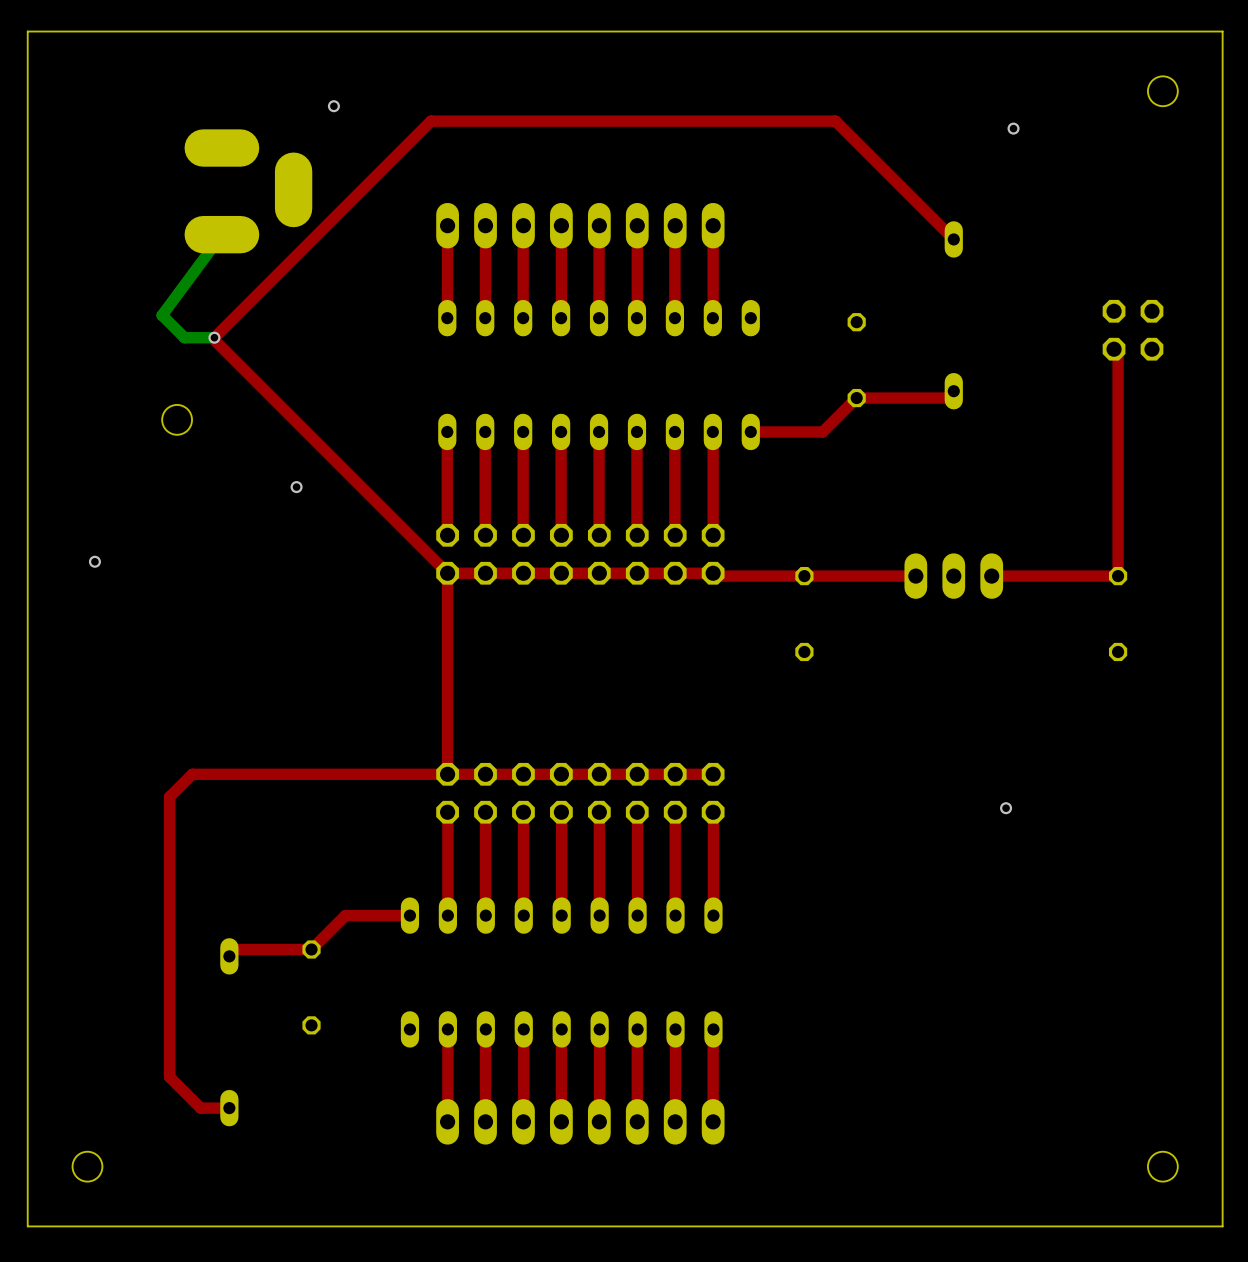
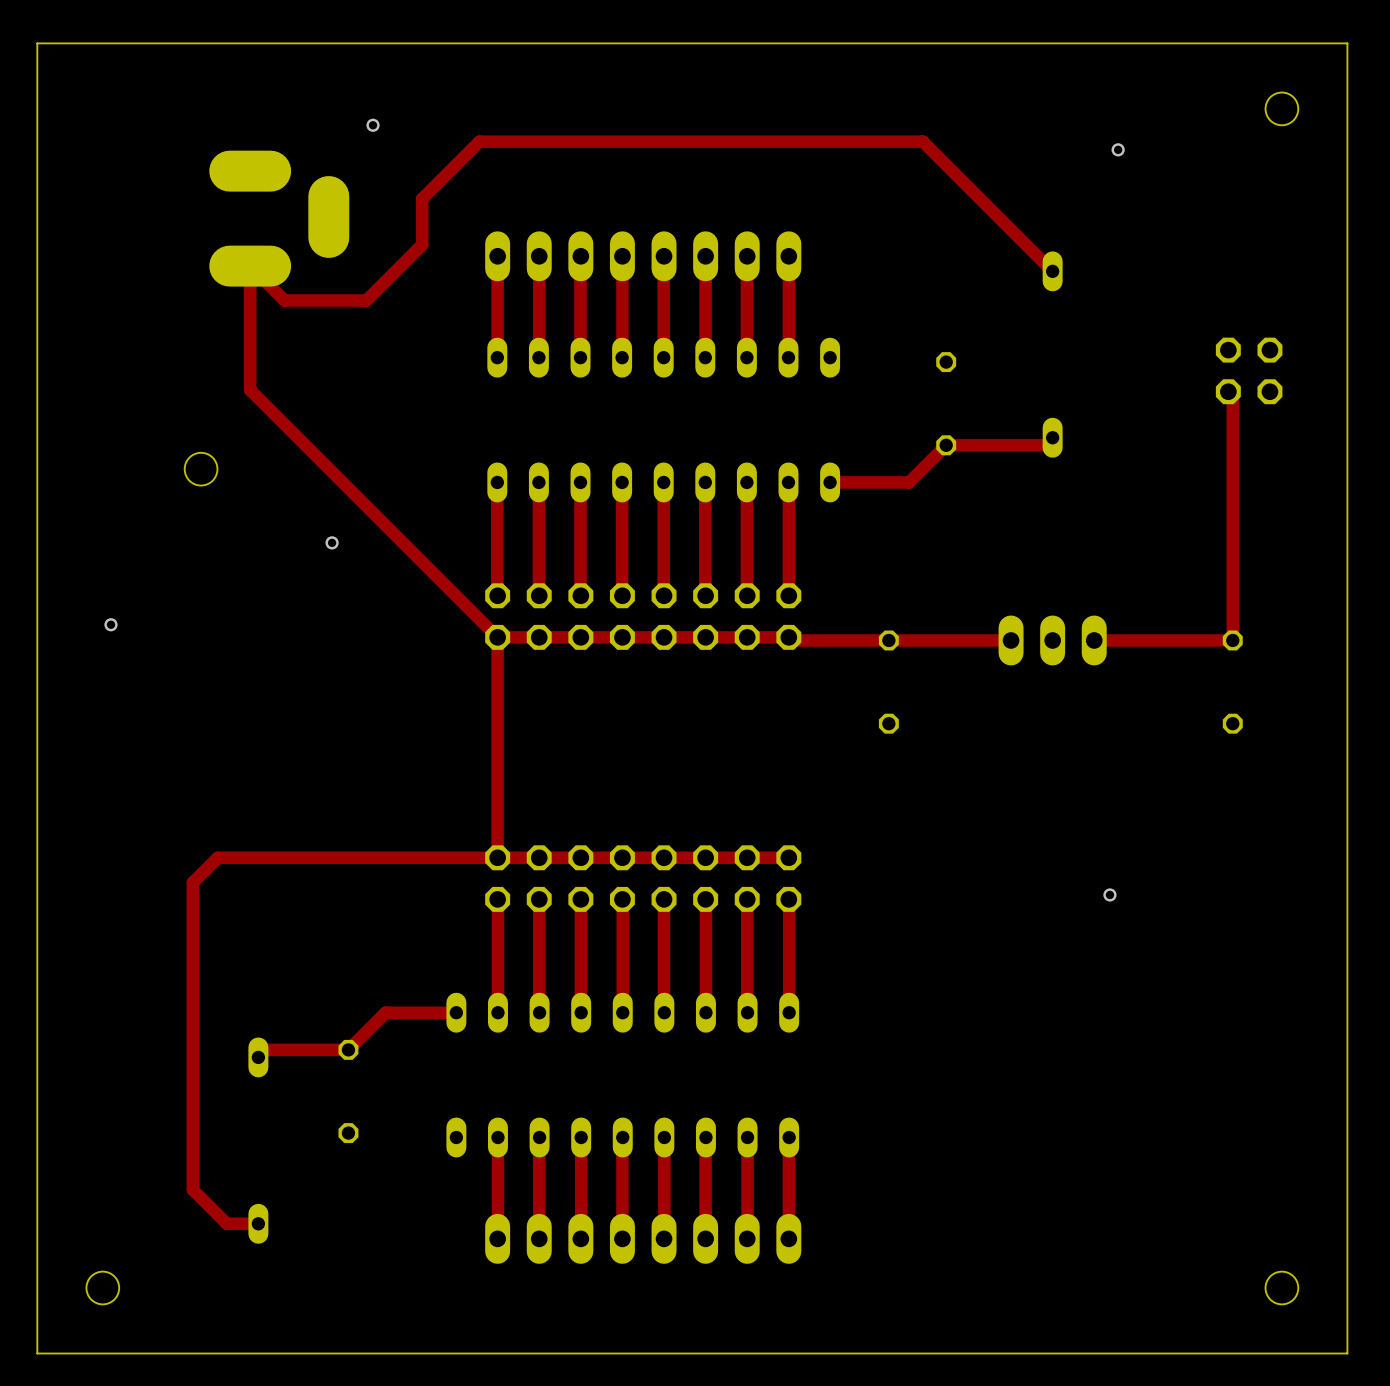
part footprint: [184, 129, 313, 254] -> [209, 150, 350, 287]
top track: (378, 173) (213, 338) (221, 347) -> (422, 198) (422, 244) (366, 300) (284, 300) (250, 266) (250, 389)
bottom track: (221, 234) (162, 315) (184, 337) (214, 337) -> none
via: (214, 337) -> none

